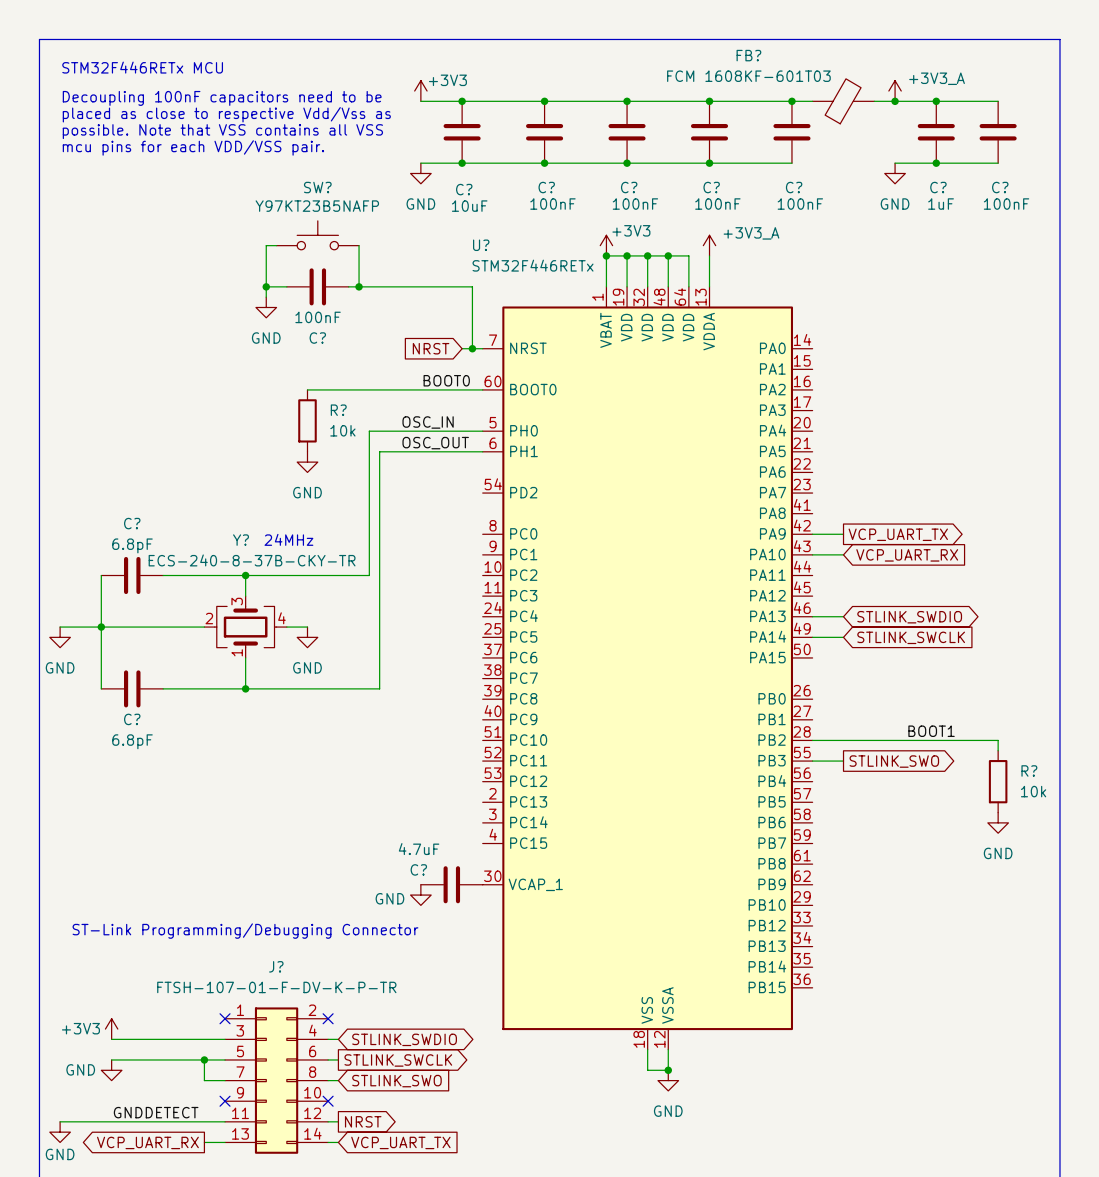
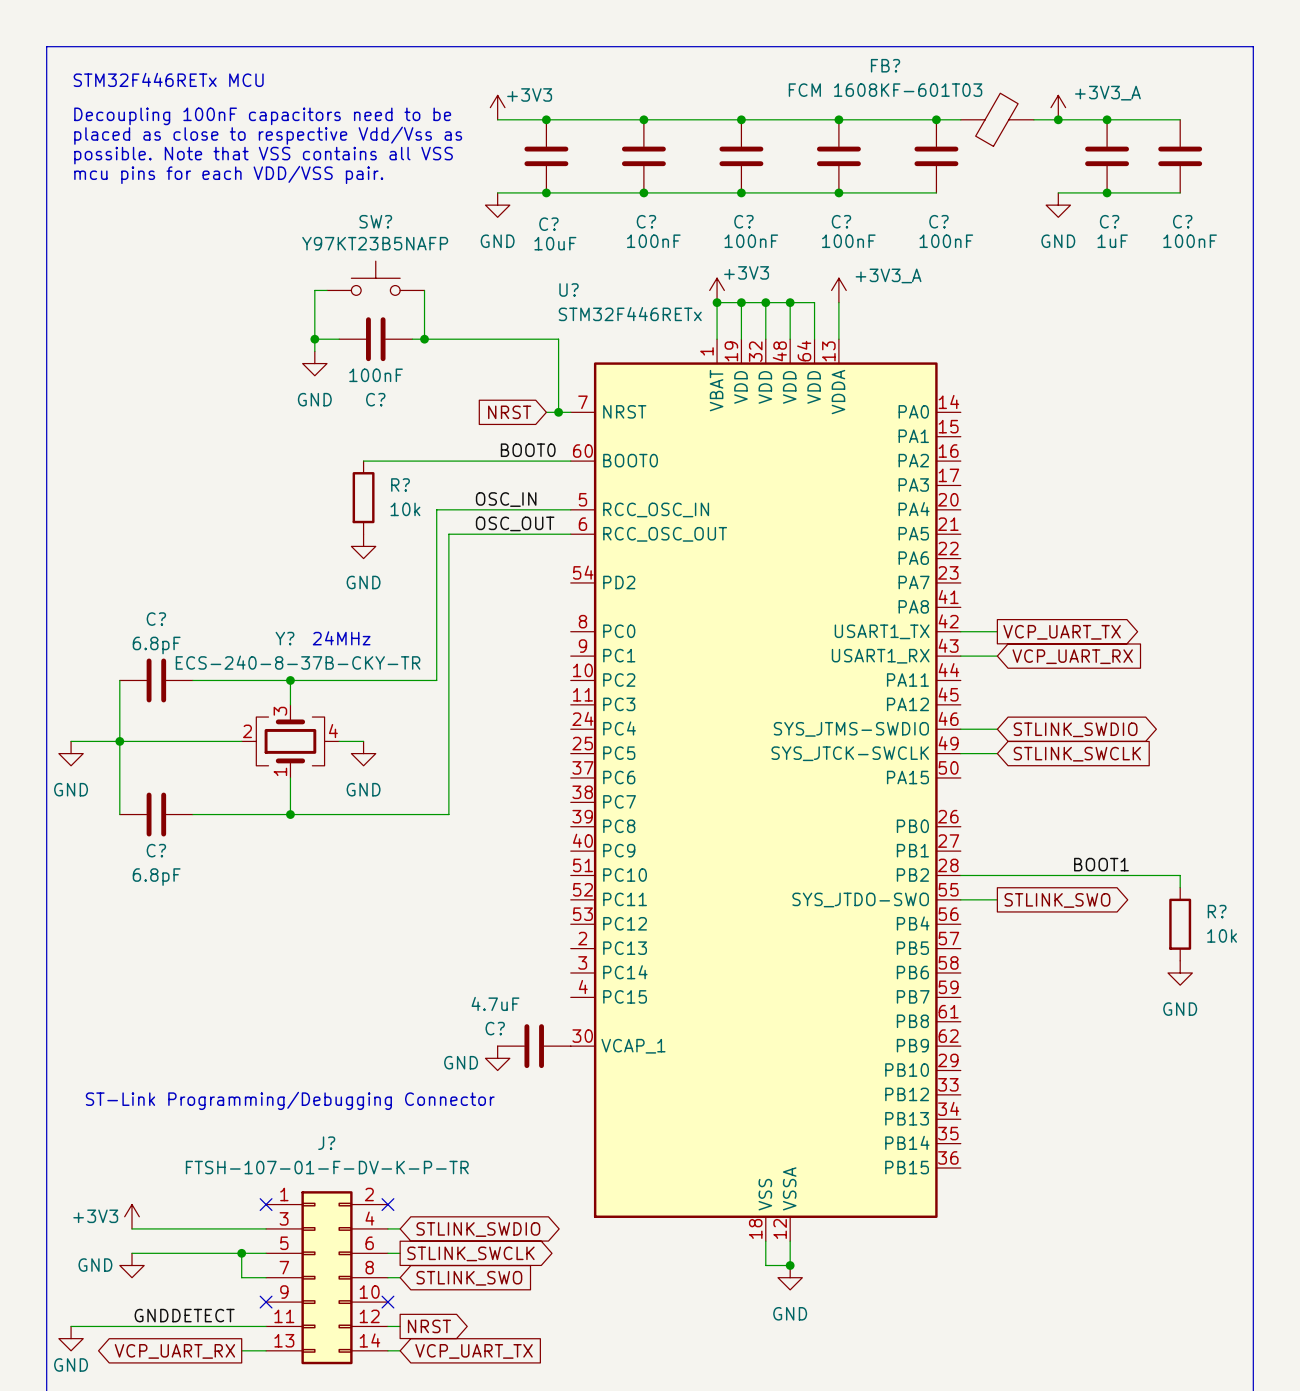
U? pin name: PH0 (523, 430) -> RCC_OSC_IN (656, 509)
U? pin name: PH1 (523, 451) -> RCC_OSC_OUT (665, 534)
U? pin name: PA9 (772, 533) -> USART1_TX (882, 631)
U? pin name: PA10 (767, 554) -> USART1_RX (880, 656)
U? pin name: PA13 (767, 616) -> SYS_JTMS-SWDIO (851, 729)
U? pin name: PA14 (768, 636) -> SYS_JTCK-SWCLK (850, 753)
U? pin name: PB3 (772, 760) -> SYS_JTDO-SWO (860, 899)

